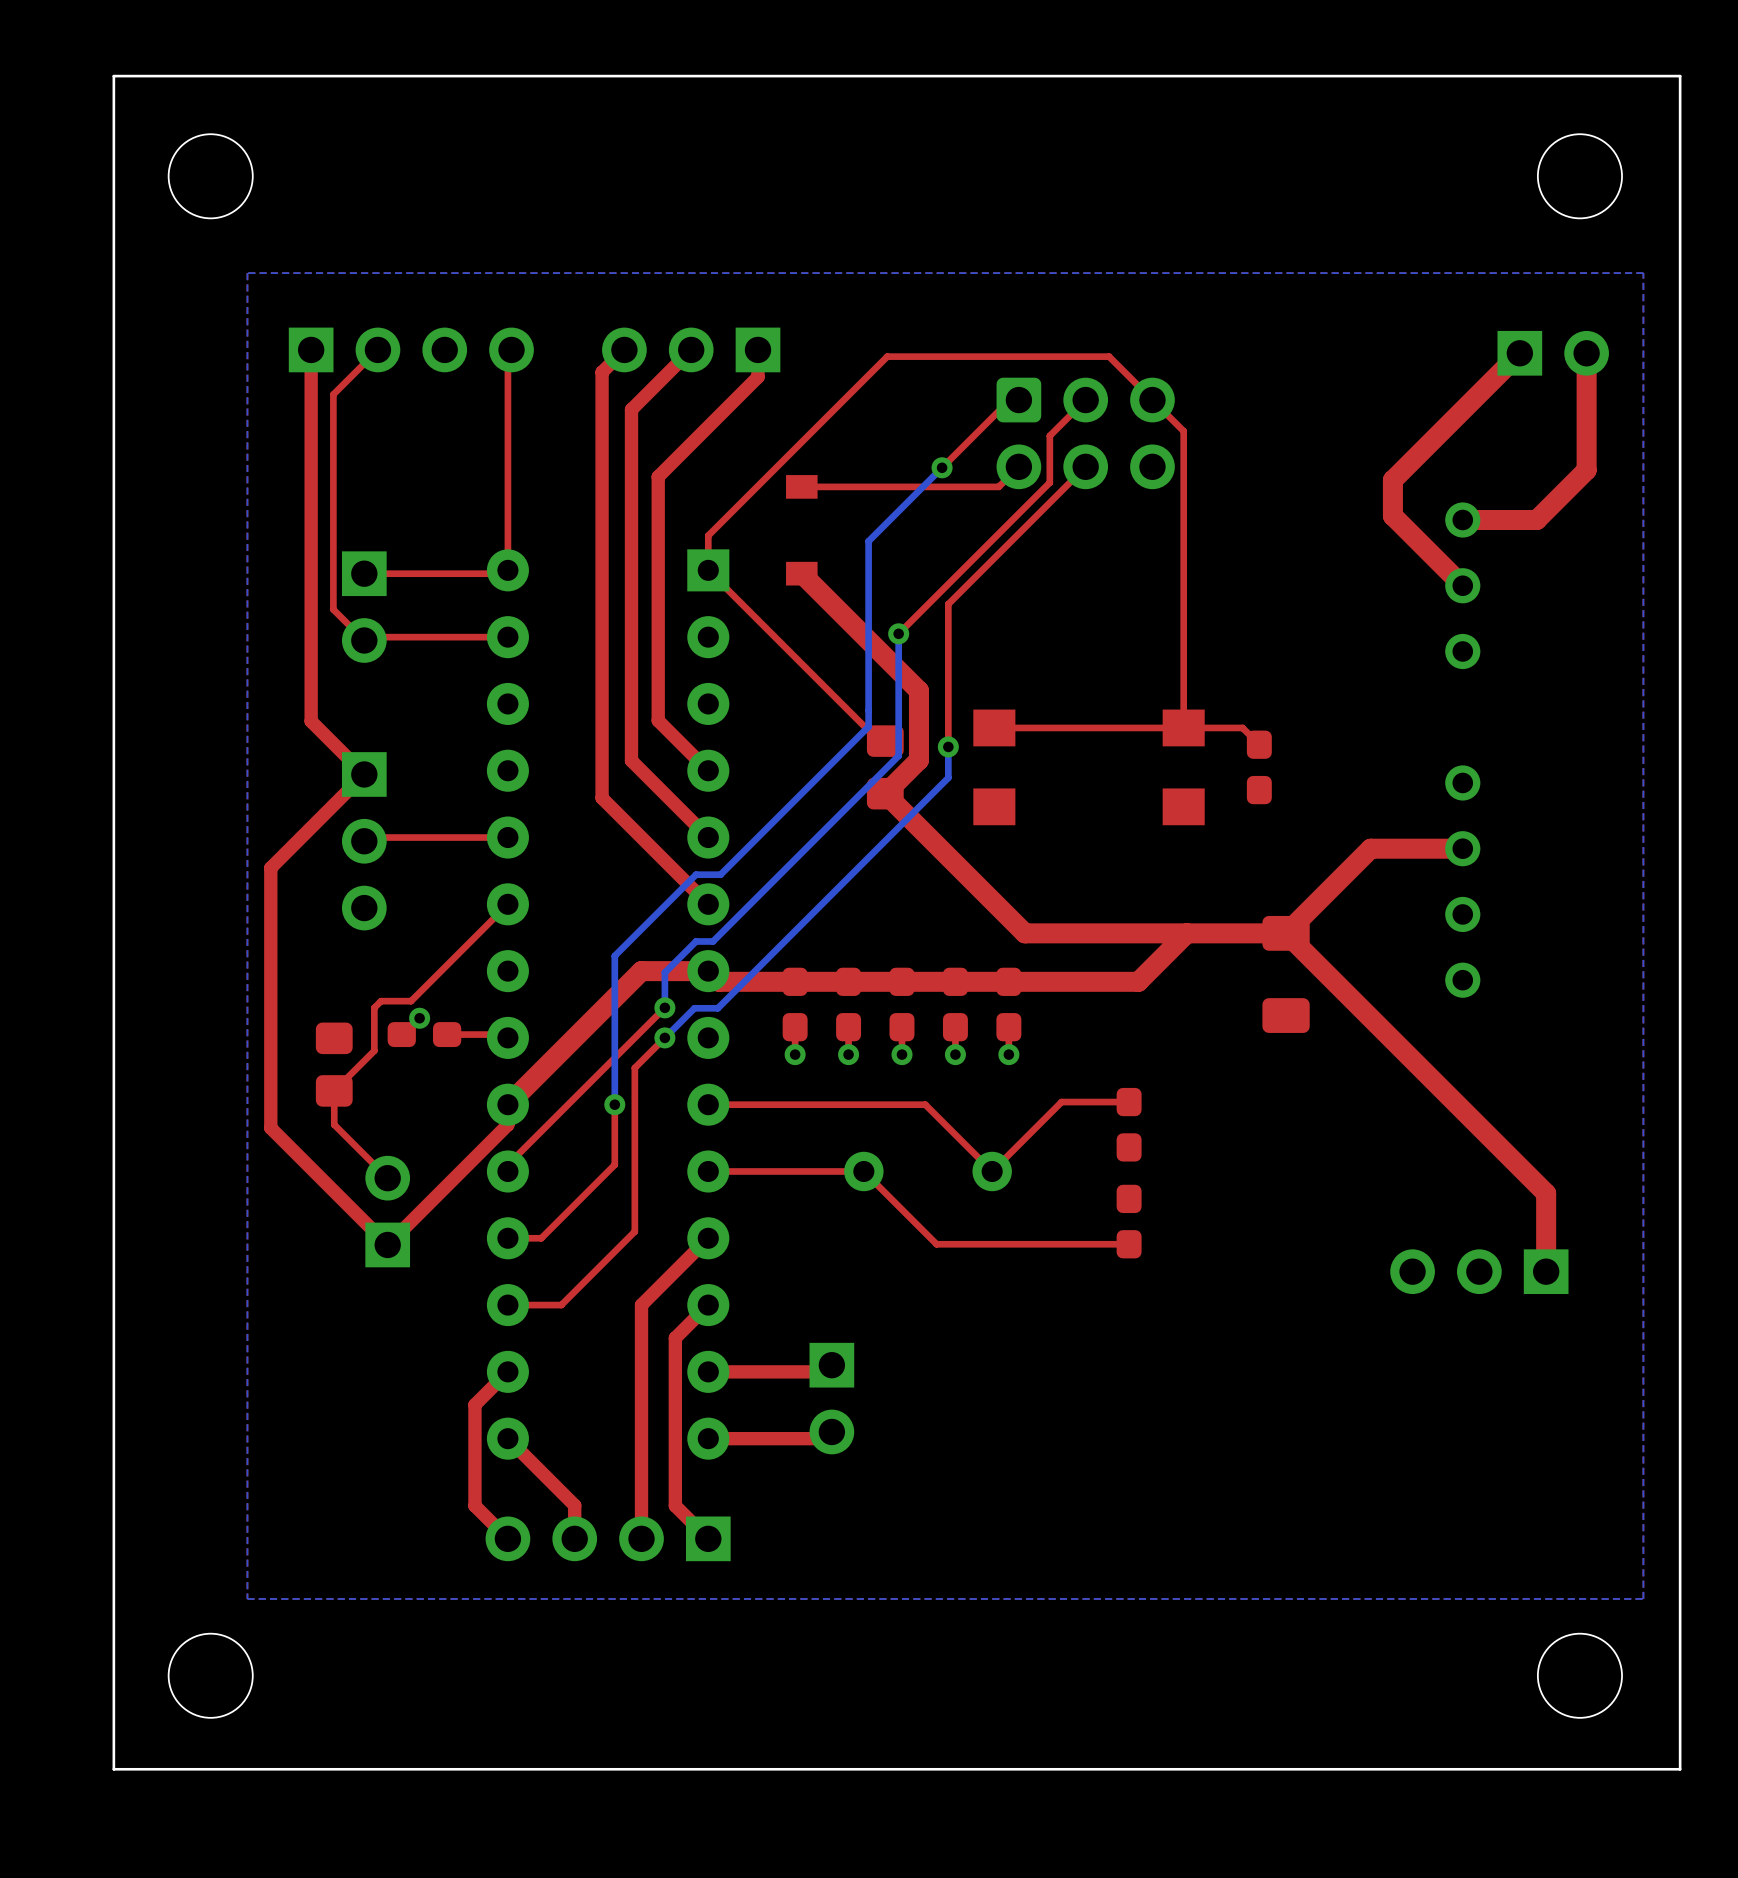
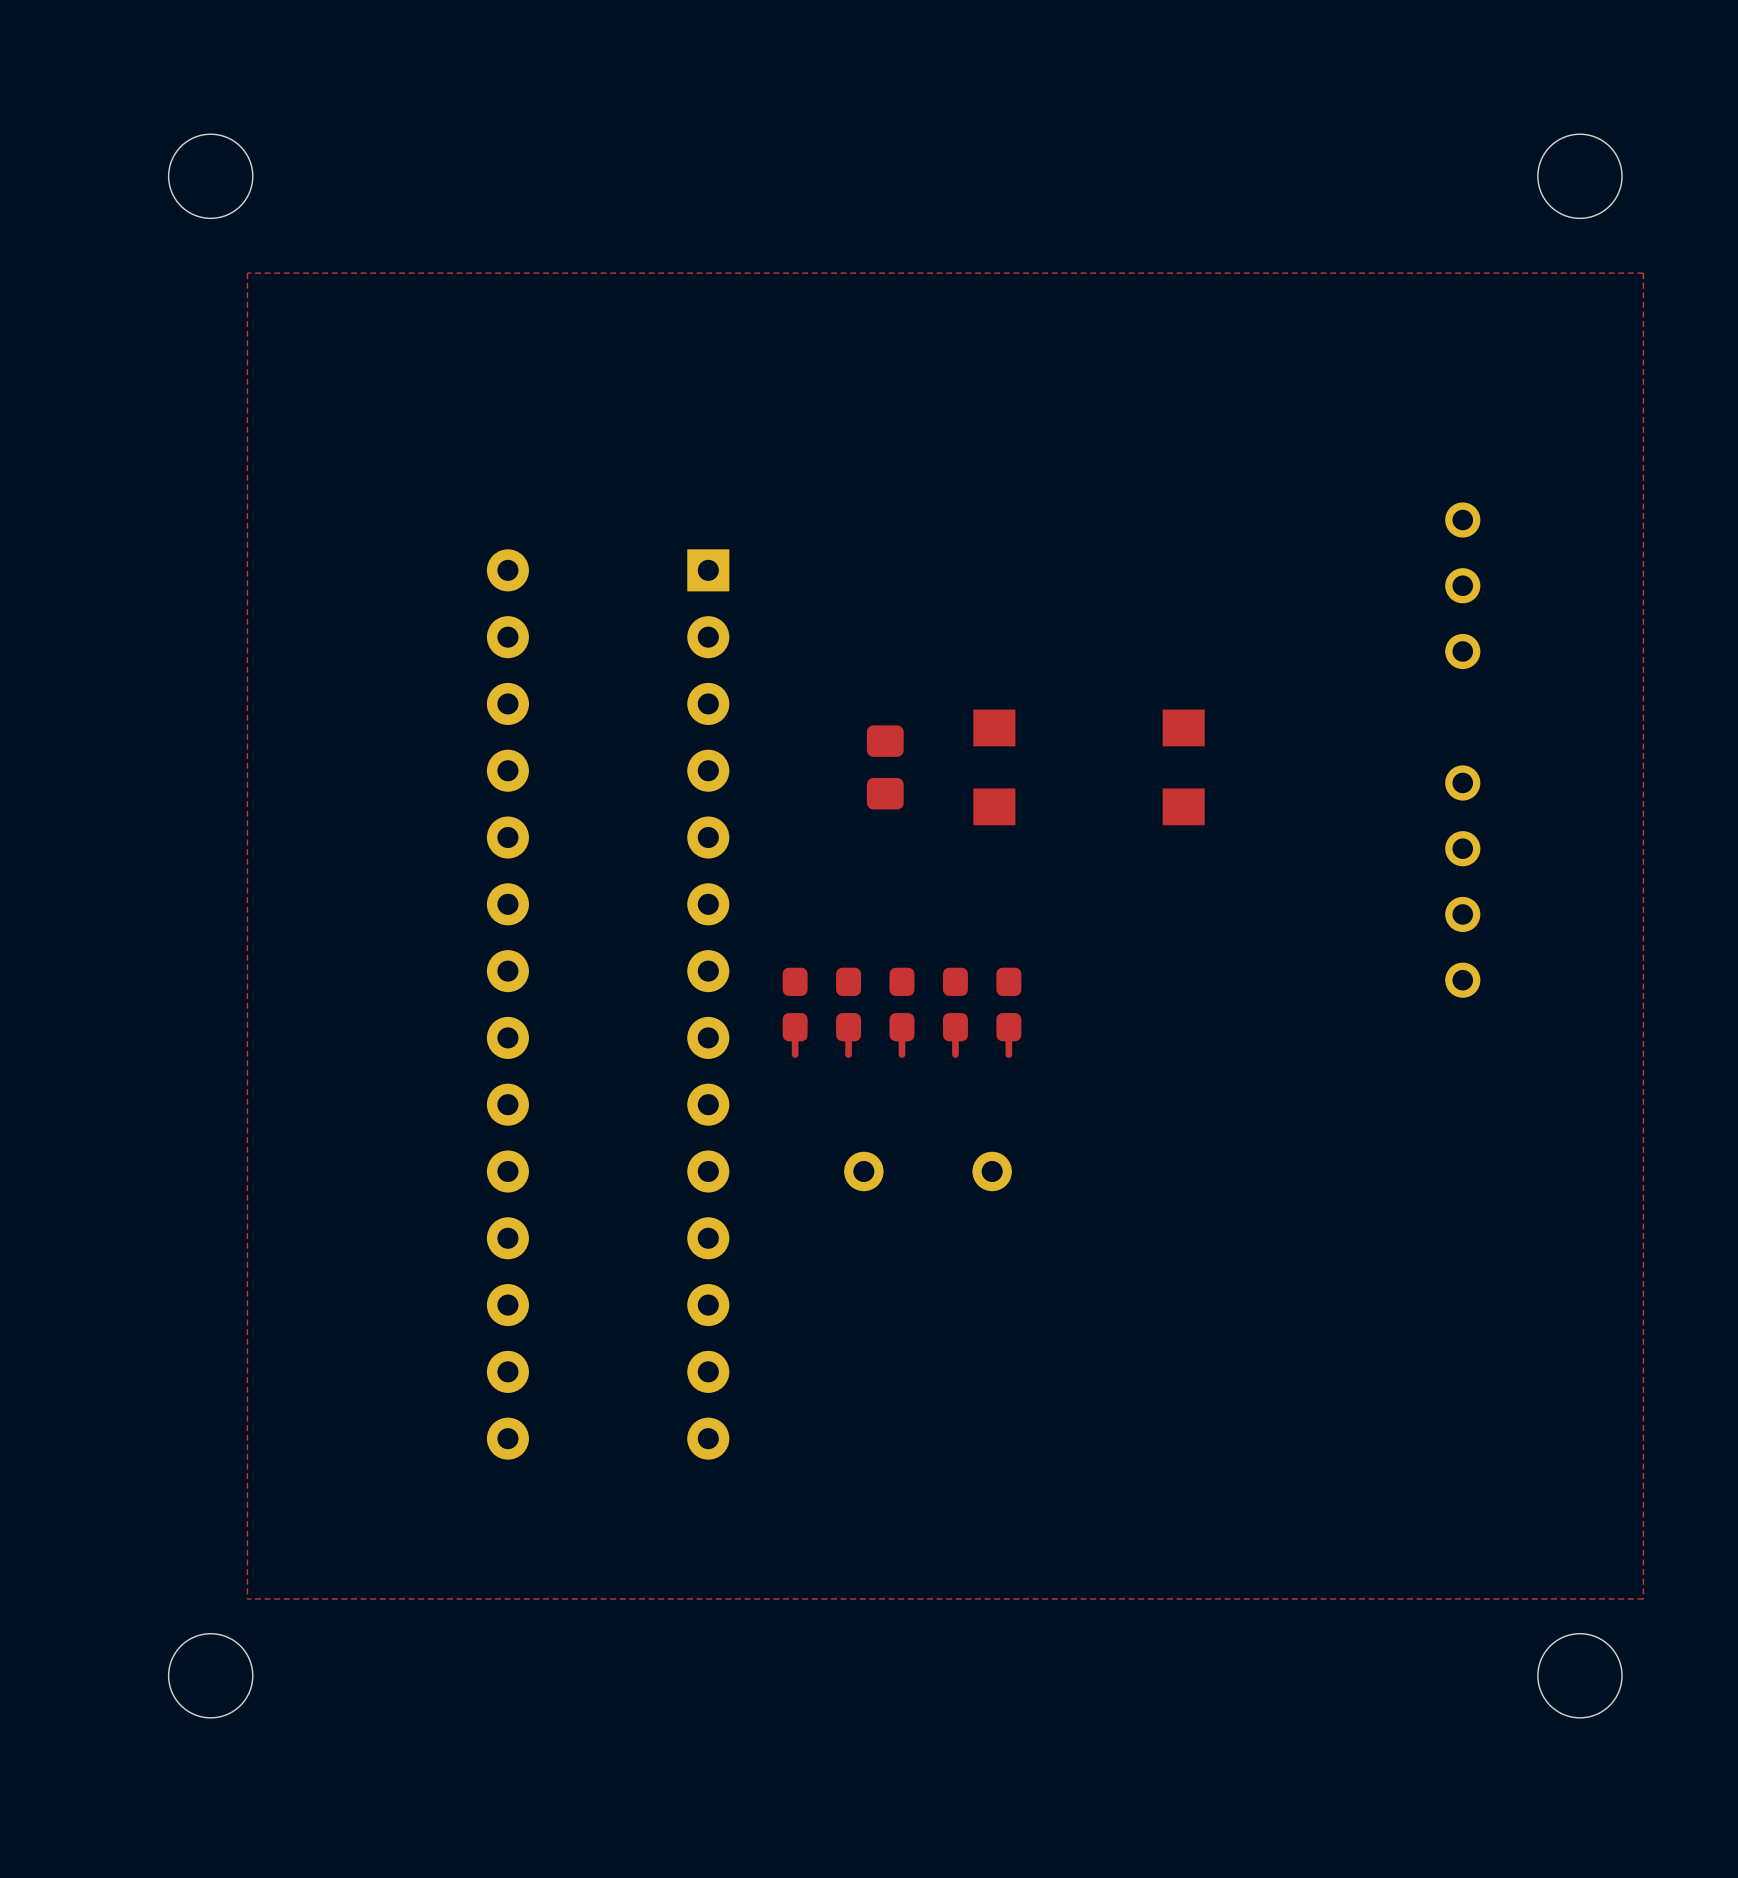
board edge: (1680, 76) (113, 76) (113, 1769) (1680, 1769) (1680, 76) -> none
bottom zone outline: (1643, 273) (1643, 1598) (247, 1598) (247, 273) (1643, 273) -> none
top track: (311, 349) (311, 721) (364, 774) (270, 867) (270, 1128) (387, 1244) (507, 1124) (507, 1104) (641, 971) (708, 971) (719, 981) (1138, 981) (1186, 933) -> none
top track: (377, 349) (333, 394) (333, 609) (364, 640) (367, 637) (507, 637) -> none
part: (411, 349) -> none
top track: (511, 349) (507, 353) (507, 570) (504, 573) (364, 573) -> none
top track: (624, 349) (602, 372) (602, 798) (708, 904) -> none
top track: (691, 349) (631, 409) (631, 760) (708, 837) -> none
part: (691, 349) -> none
top track: (758, 349) (758, 377) (658, 476) (658, 720) (708, 770) -> none
top track: (1519, 353) (1392, 480) (1392, 515) (1462, 585) -> none
part: (1553, 353) -> none
top track: (1586, 353) (1586, 470) (1536, 520) (1462, 520) -> none
top track: (1018, 400) (1009, 400) (942, 467) -> none
top track: (1085, 400) (1049, 435) (1049, 482) (898, 633) -> none
part: (1085, 433) -> none
top track: (1018, 466) (998, 486) (801, 486) -> none
top track: (1085, 466) (948, 604) (948, 746) -> none
bottom track: (942, 467) (868, 541) (868, 726) (720, 874) (696, 874) (614, 955) (614, 1104) -> none
via: (942, 467) -> none
part: (801, 530) -> none
top track: (801, 573) (918, 690) (918, 760) (885, 793) (1024, 933) (1286, 933) -> none
part: (364, 607) -> none
bottom track: (898, 633) (898, 755) (713, 941) (696, 941) (664, 972) (664, 1007) -> none
via: (898, 633) -> none
top track: (994, 727) (1242, 727) (1259, 744) -> none
top track: (1183, 727) (1183, 431) (1109, 356) (887, 356) (708, 535) (708, 570) (879, 741) (885, 741) -> none
bottom track: (948, 746) (948, 777) (717, 1008) (694, 1008) (664, 1037) -> none
via: (948, 746) -> none
part: (1259, 767) -> none
top track: (507, 837) (368, 837) (364, 841) -> none
part: (364, 841) -> none
top track: (1462, 848) (1370, 848) (1286, 933) -> none
top track: (507, 904) (411, 1001) (381, 1001) (374, 1007) (374, 1050) (334, 1090) (334, 1124) (387, 1178) -> none
top track: (1286, 933) (1546, 1193) (1546, 1271) -> none
part: (1286, 974) -> none
top track: (664, 1007) (507, 1164) (507, 1171) -> none
via: (664, 1007) -> none
via: (419, 1018) -> none
part: (424, 1034) -> none
top track: (447, 1034) (504, 1034) (507, 1037) -> none
top track: (664, 1037) (634, 1067) (634, 1231) (561, 1305) (507, 1305) -> none
via: (664, 1037) -> none
via: (795, 1054) -> none
via: (848, 1054) -> none
via: (902, 1054) -> none
via: (955, 1054) -> none
via: (1008, 1054) -> none
part: (334, 1064) -> none
top track: (1129, 1102) (1061, 1102) (992, 1171) (925, 1104) (708, 1104) -> none
top track: (614, 1104) (614, 1164) (541, 1238) (507, 1238) -> none
via: (614, 1104) -> none
part: (1129, 1124) -> none
top track: (708, 1171) (863, 1171) (936, 1244) (1129, 1244) -> none
part: (387, 1211) -> none
part: (1129, 1221) -> none
top track: (708, 1238) (641, 1305) (641, 1538) -> none
part: (1479, 1271) -> none
top track: (708, 1305) (675, 1338) (675, 1505) (708, 1538) -> none
top track: (831, 1365) (825, 1371) (708, 1371) -> none
top track: (507, 1371) (474, 1404) (474, 1505) (507, 1538) -> none
part: (831, 1398) -> none
top track: (831, 1431) (825, 1438) (708, 1438) -> none
top track: (507, 1438) (574, 1505) (574, 1538) -> none
part: (608, 1538) -> none

